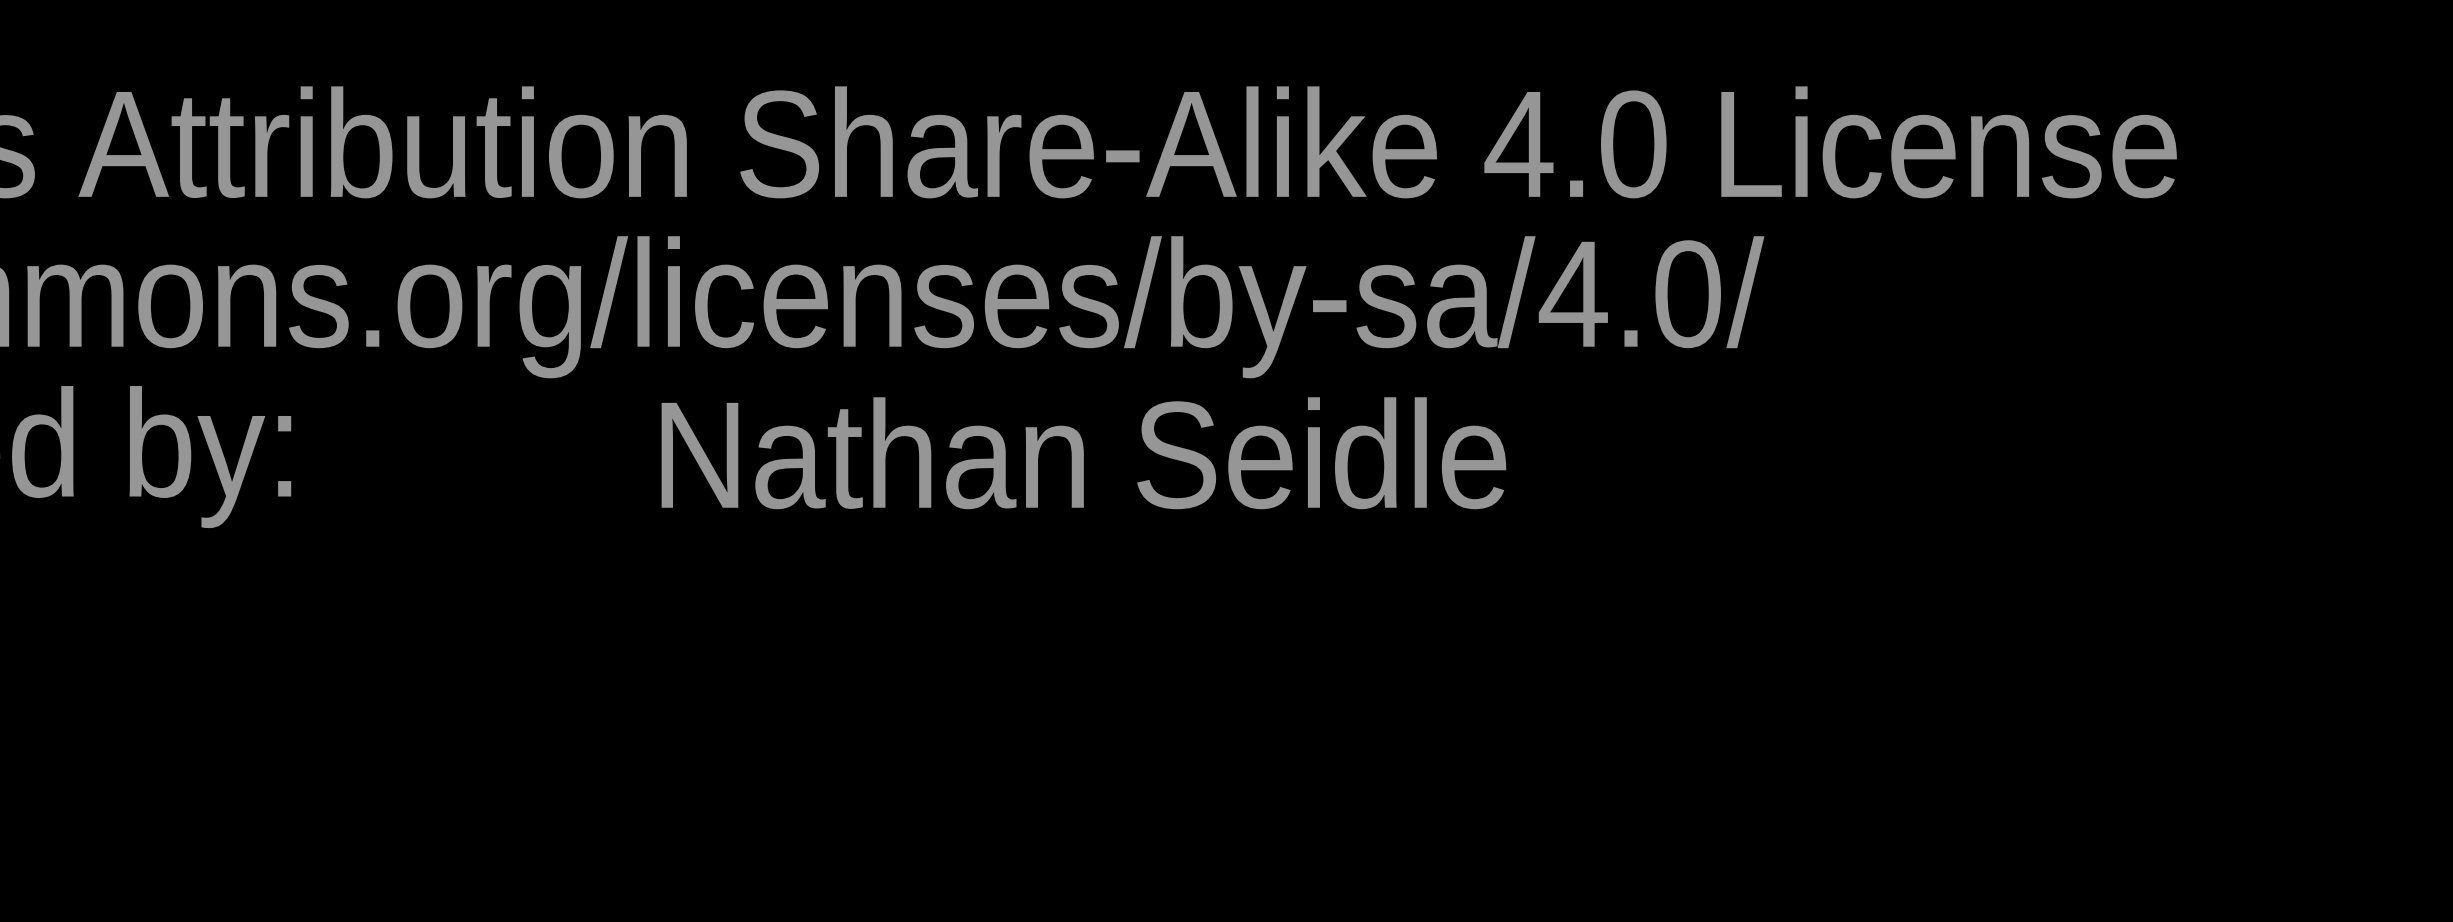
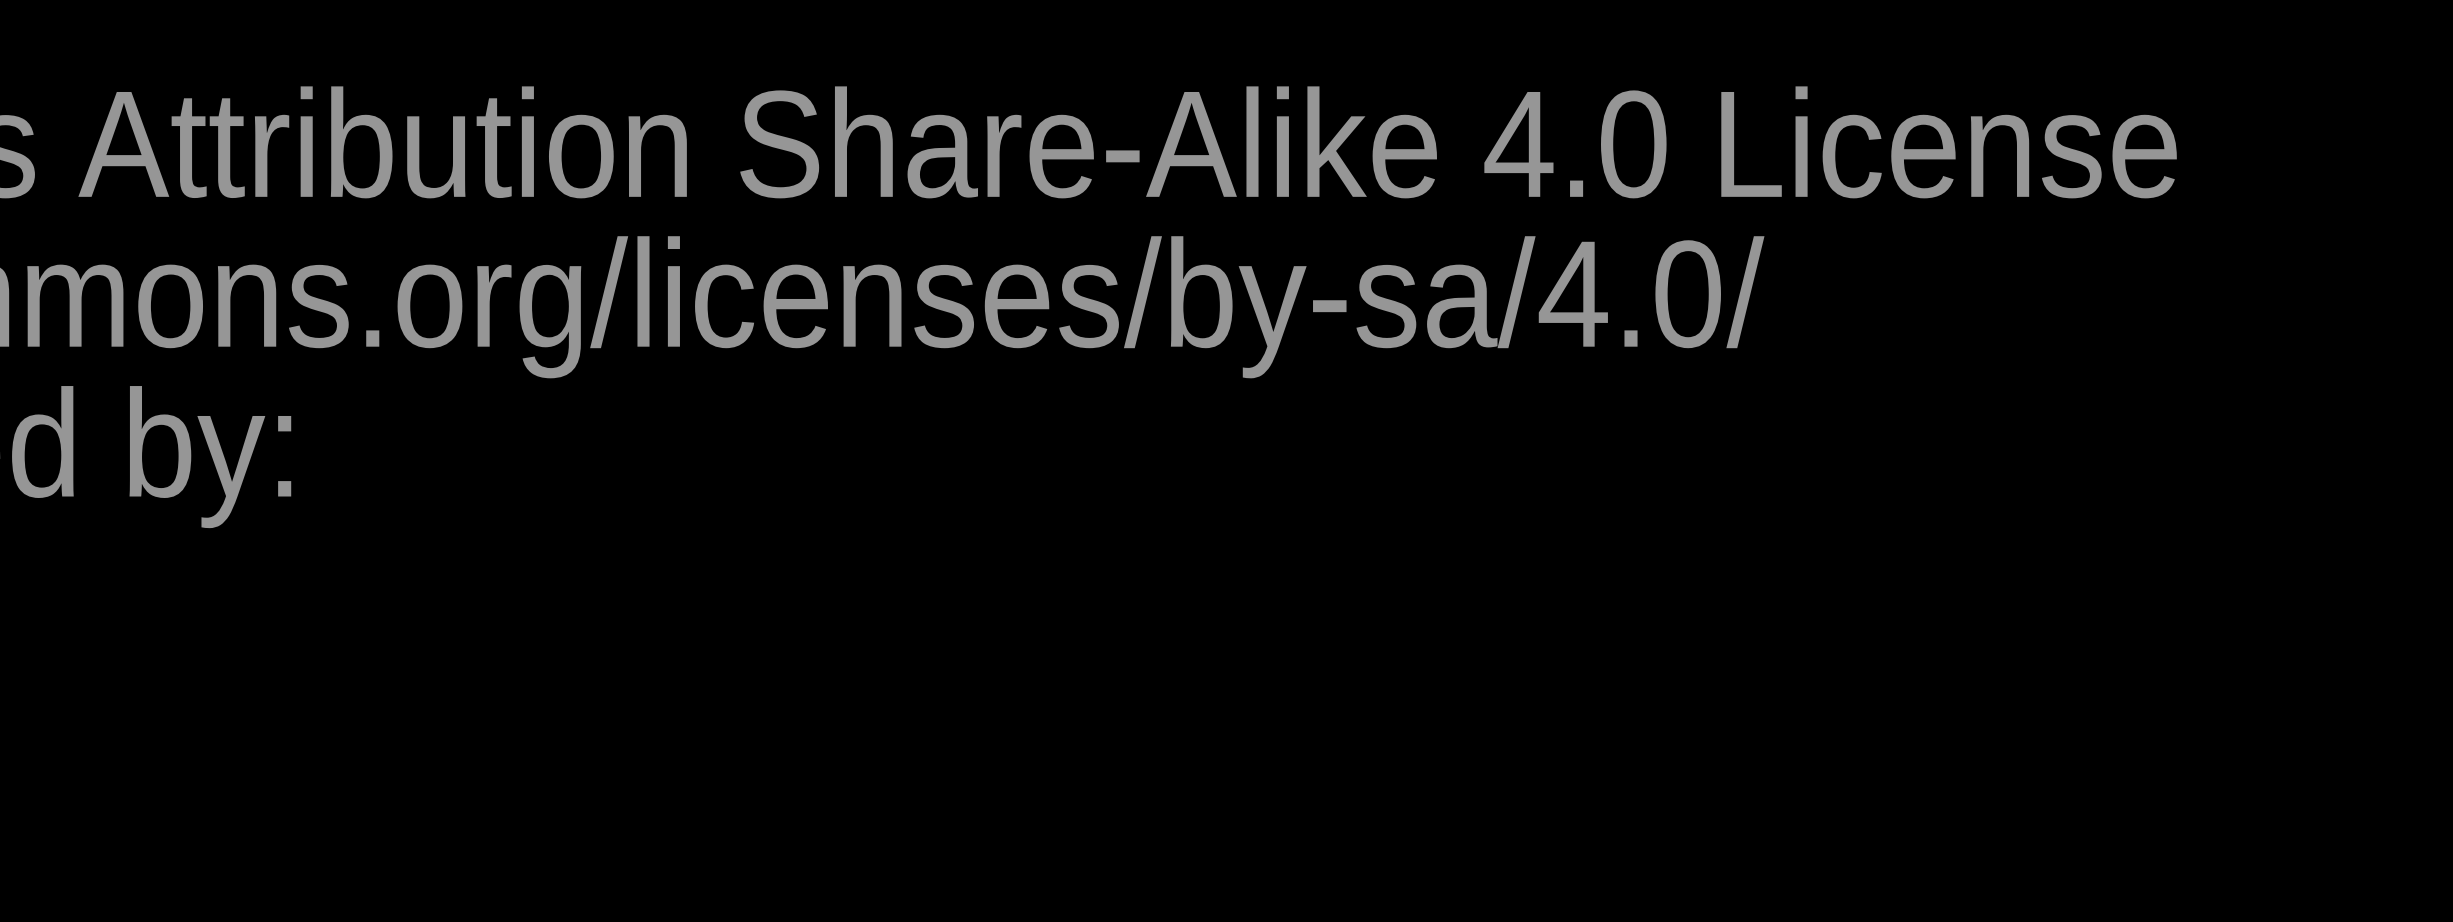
text: Nathan Seidle (1083, 453) -> none

